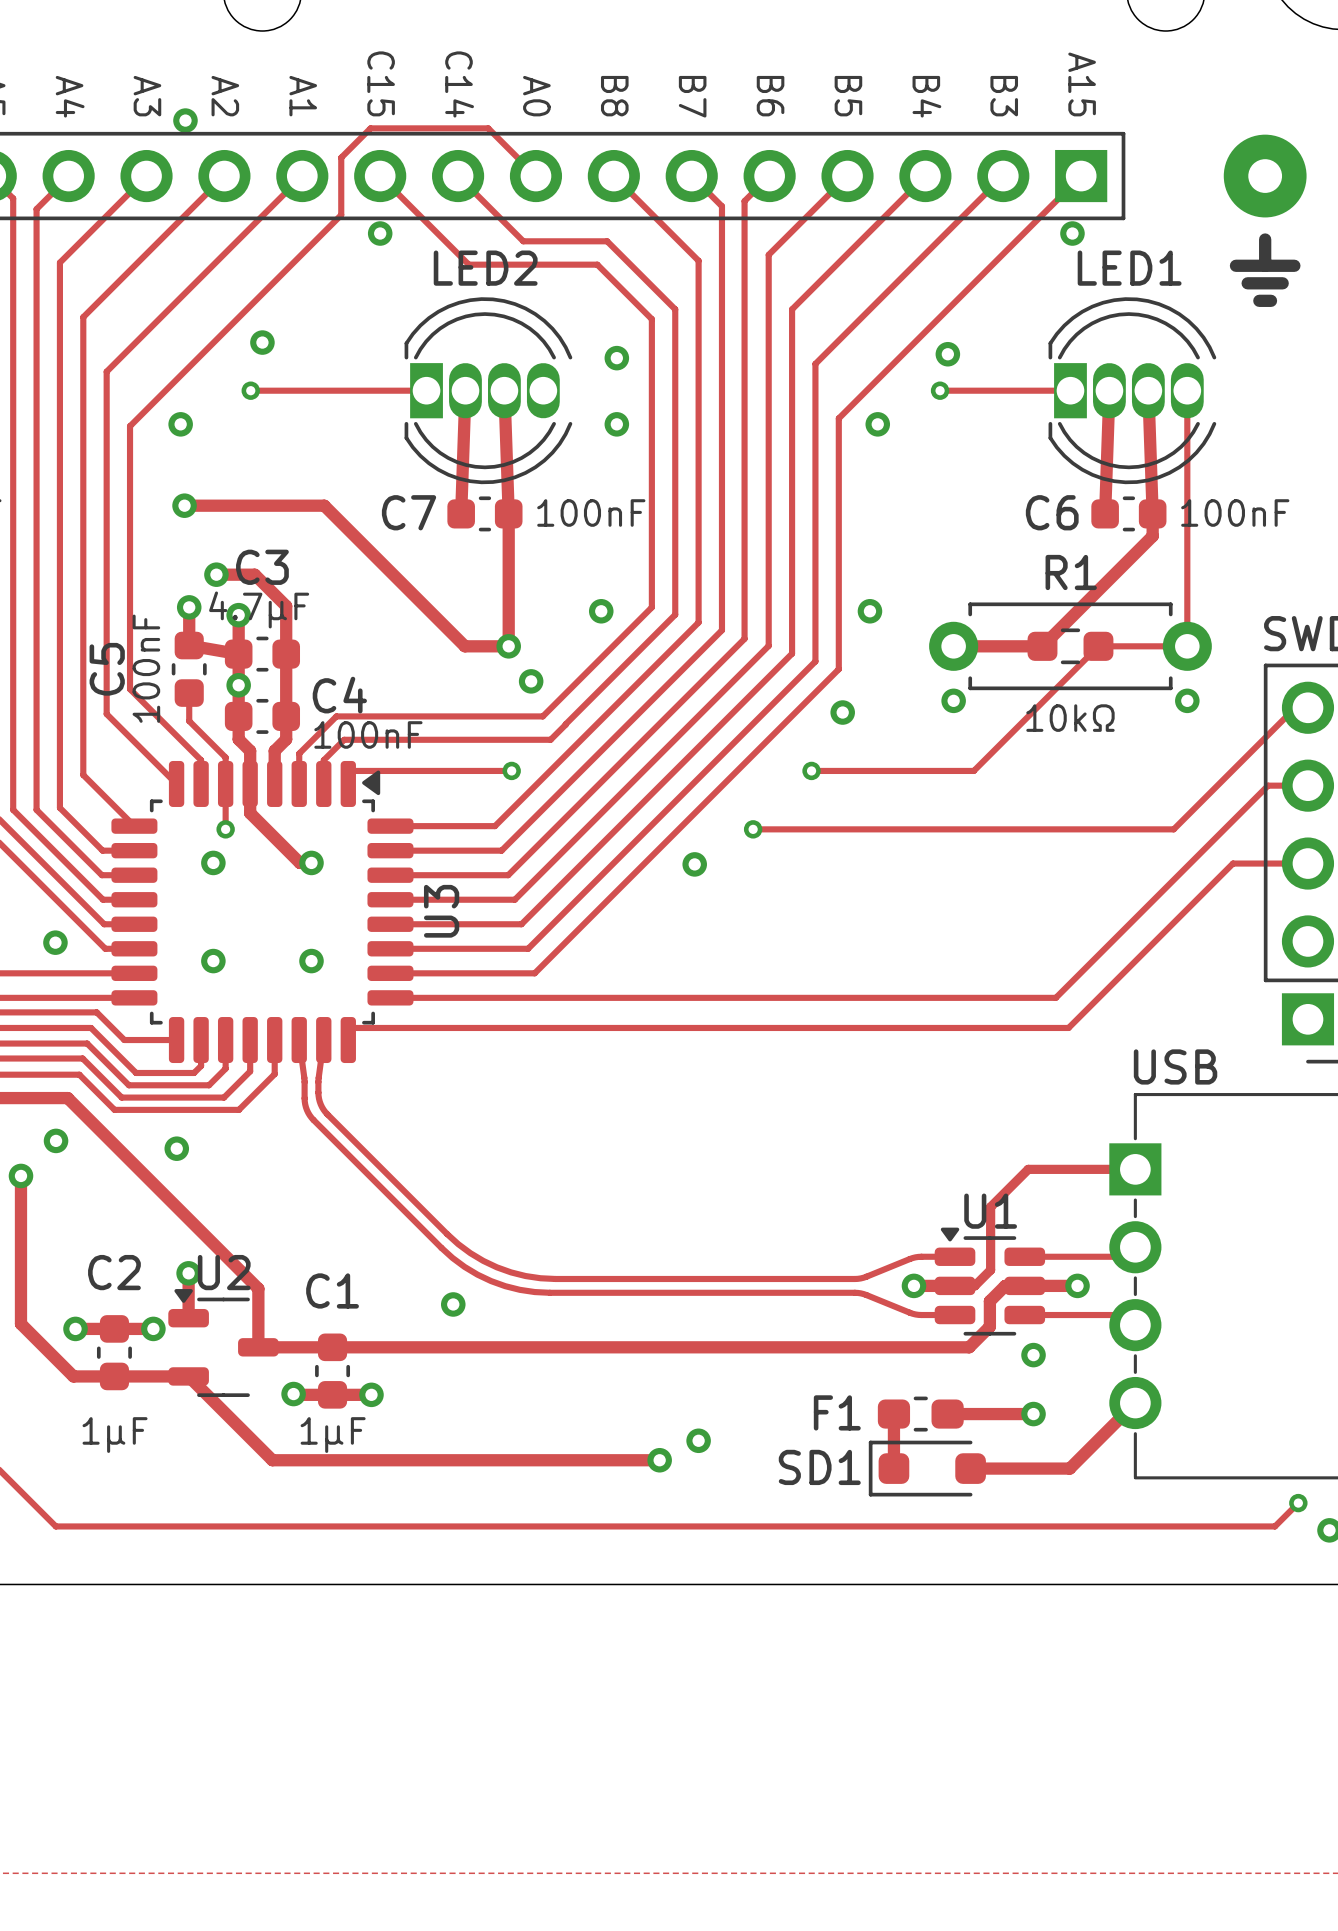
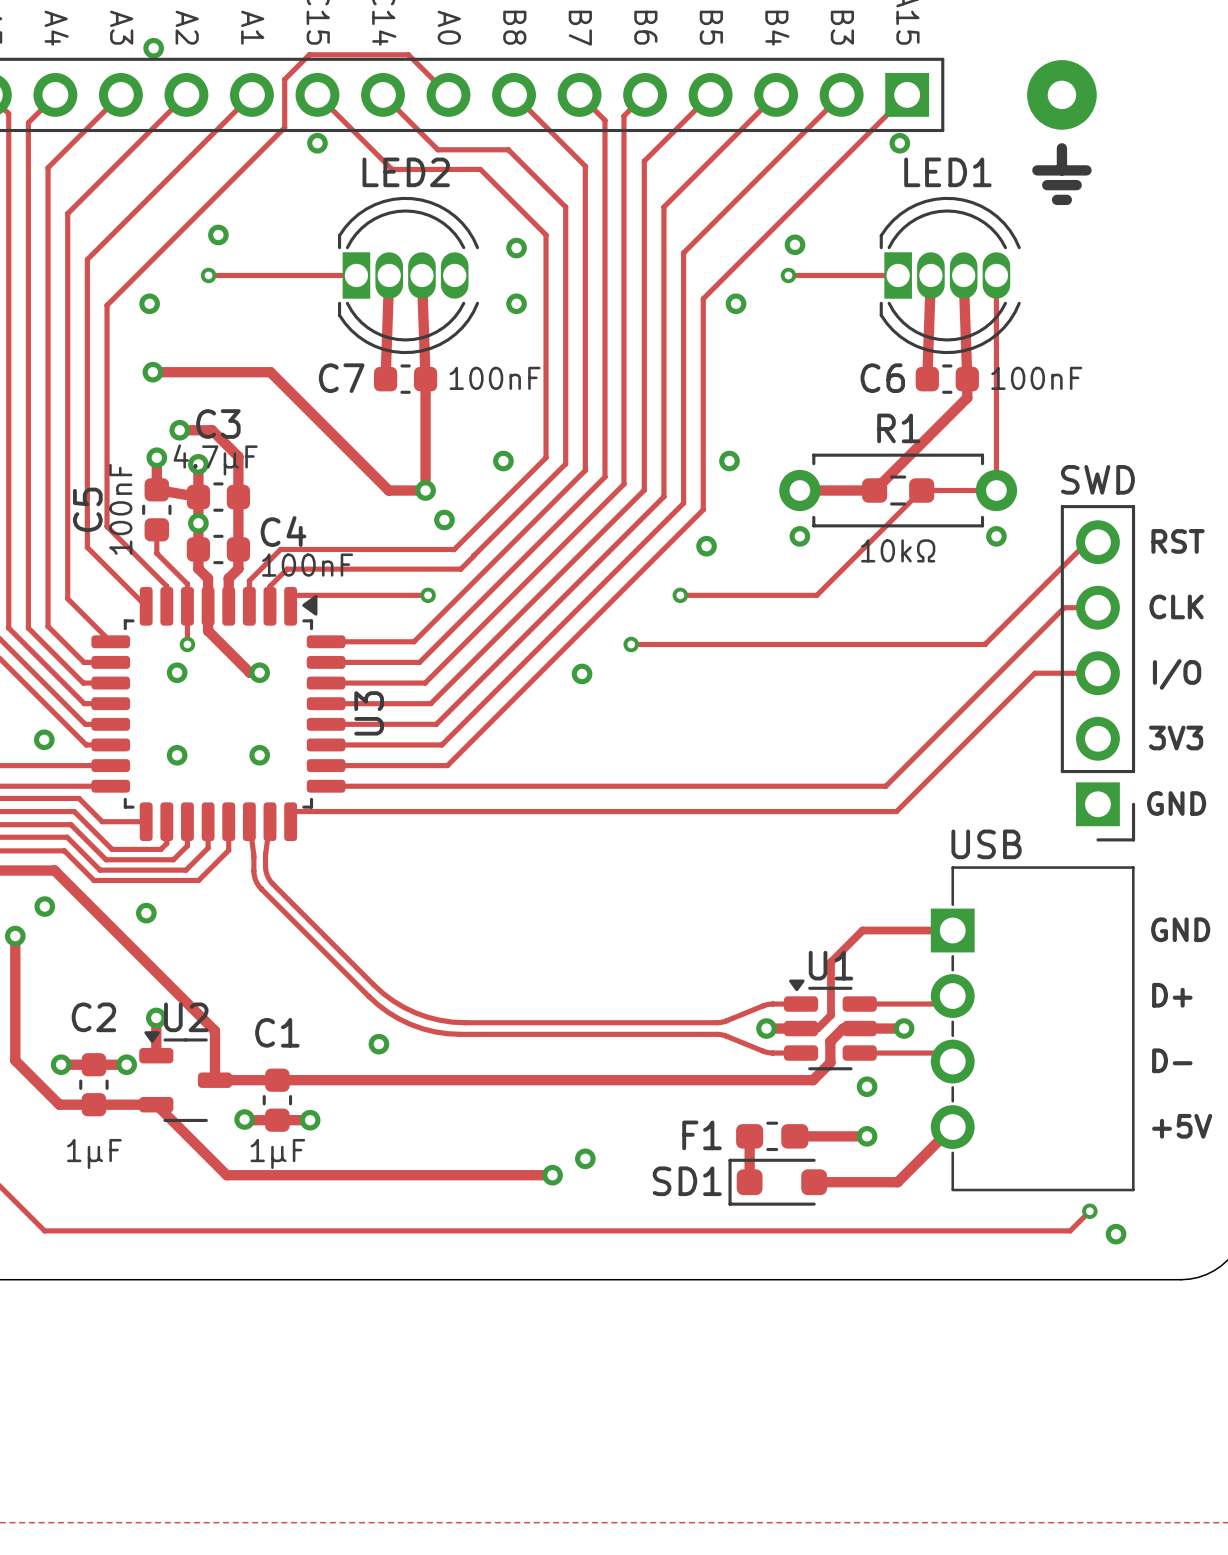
track: (573, 264) (597, 264) (651, 319) (651, 342) -> (480, 169) (546, 234)

